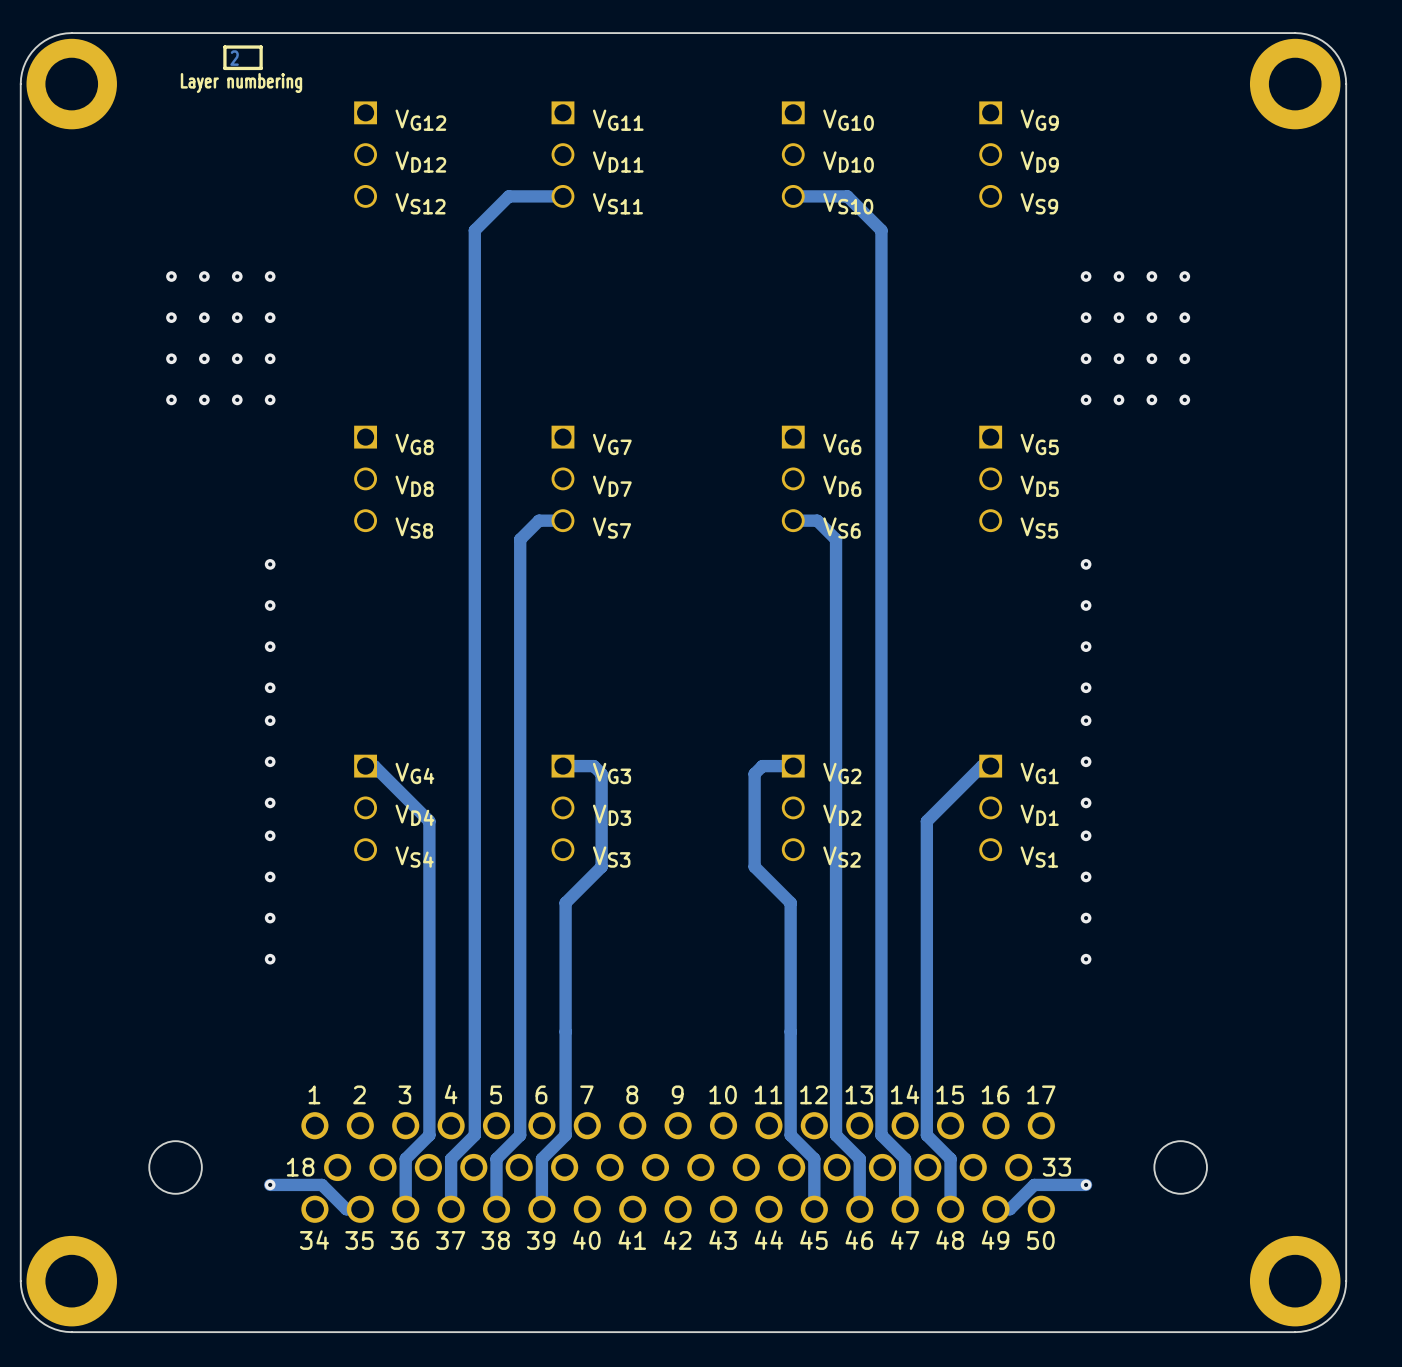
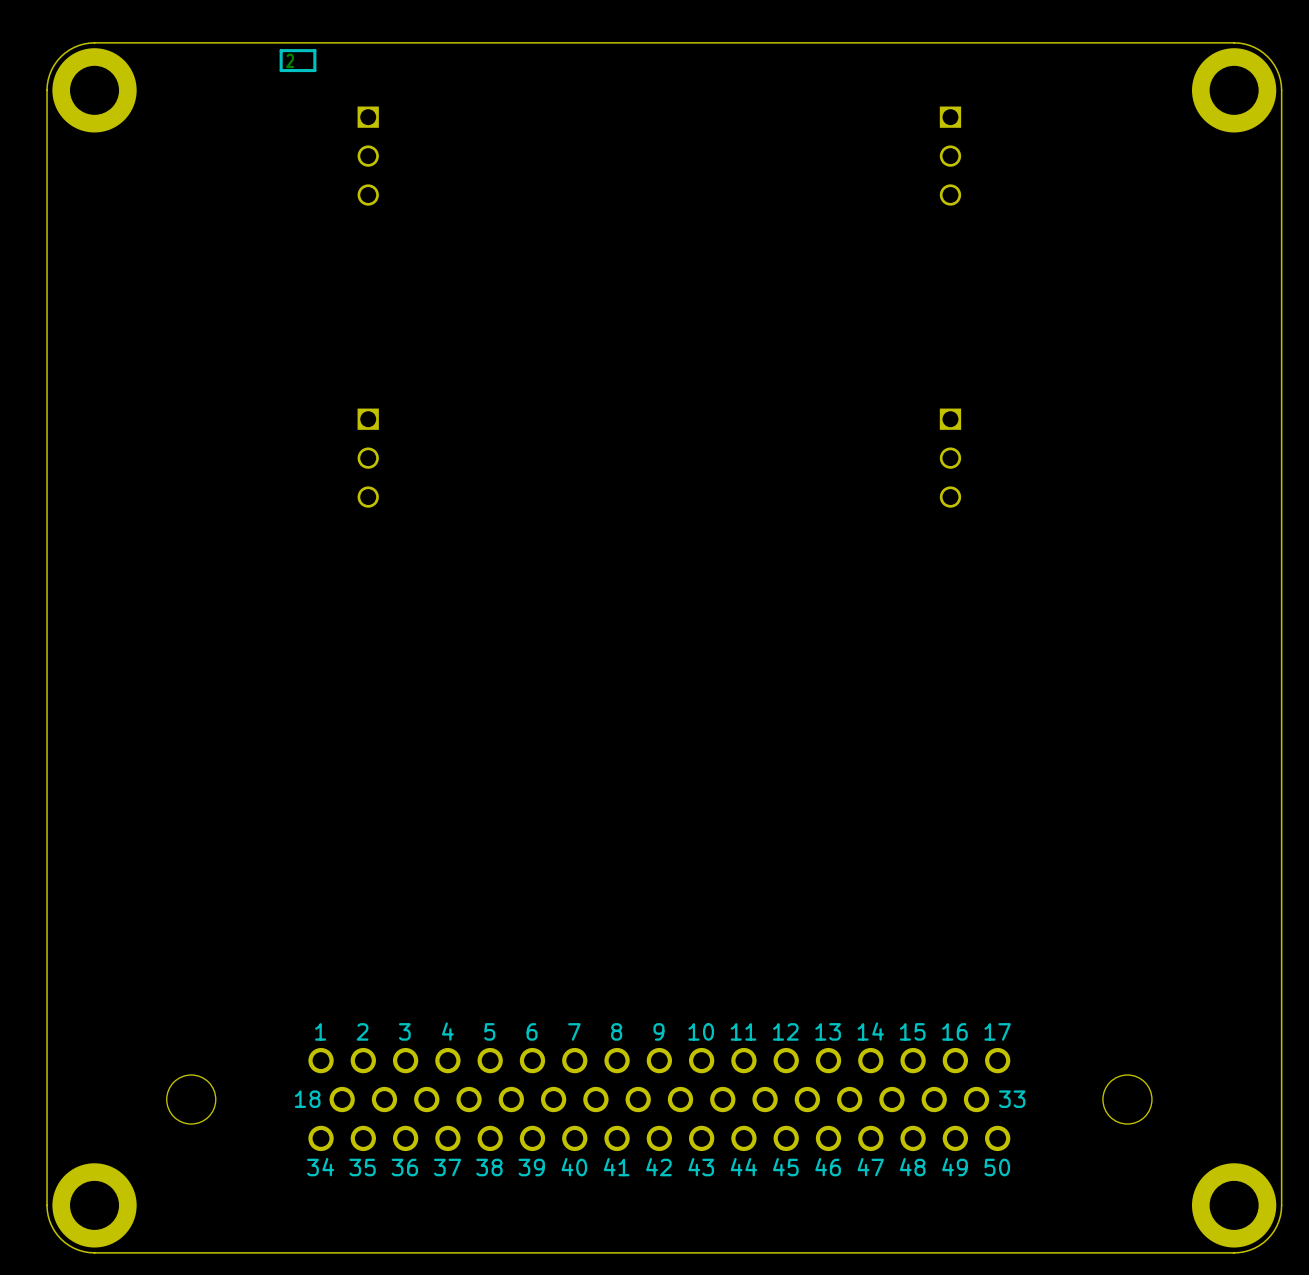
line: (261, 47) (261, 68) (224, 68) (224, 47) (261, 47) -> (314, 50) (314, 70) (281, 70) (281, 50) (314, 50)
text position: 2 (234, 58) -> 2 (290, 60)
text: Layer numbering (241, 82) -> none
text: VG12 (420, 120) -> none
text: VG11 (618, 120) -> none
text: VG10 (848, 120) -> none
text: VG9 (1039, 120) -> none
part: (562, 154) -> none
part: (793, 154) -> none
text: VD12 (420, 162) -> none
text: VD11 (618, 162) -> none
text: VD10 (848, 162) -> none
text: VD9 (1039, 162) -> none
track: (562, 196) (508, 196) (474, 230) (474, 1135) (451, 1158) (451, 1209) -> none
track: (793, 196) (847, 196) (881, 230) (881, 1135) (905, 1158) (905, 1209) -> none
text: VS12 (420, 203) -> none
text: VS11 (617, 203) -> none
text: VS10 (848, 203) -> none
text: VS9 (1039, 203) -> none
via: (171, 276) -> none
via: (204, 276) -> none
via: (237, 276) -> none
via: (270, 276) -> none
via: (1086, 276) -> none
via: (1118, 276) -> none
via: (1151, 276) -> none
via: (1184, 276) -> none
via: (171, 317) -> none
via: (204, 317) -> none
via: (237, 317) -> none
via: (270, 317) -> none
via: (1086, 317) -> none
via: (1118, 317) -> none
via: (1151, 317) -> none
via: (1184, 317) -> none
via: (171, 358) -> none
via: (204, 358) -> none
via: (237, 358) -> none
via: (270, 358) -> none
via: (1086, 358) -> none
via: (1118, 358) -> none
via: (1151, 358) -> none
via: (1184, 358) -> none
via: (171, 399) -> none
via: (204, 399) -> none
via: (237, 399) -> none
via: (270, 399) -> none
via: (1086, 399) -> none
via: (1118, 399) -> none
via: (1151, 399) -> none
via: (1184, 399) -> none
text: VG8 (414, 444) -> none
text: VG7 (612, 444) -> none
text: VG6 (842, 444) -> none
text: VG5 (1039, 444) -> none
part: (562, 478) -> none
part: (793, 478) -> none
text: VD8 (414, 486) -> none
text: VD7 (612, 486) -> none
text: VD6 (842, 486) -> none
text: VD5 (1039, 486) -> none
track: (562, 520) (539, 520) (520, 539) (520, 1135) (496, 1158) (496, 1209) -> none
track: (793, 520) (817, 520) (836, 539) (836, 1135) (859, 1158) (859, 1209) -> none
text: VS8 (414, 528) -> none
text: VS7 (611, 528) -> none
text: VS6 (841, 528) -> none
text: VS5 (1039, 528) -> none
via: (270, 564) -> none
via: (1086, 564) -> none
via: (270, 605) -> none
via: (1086, 605) -> none
via: (270, 646) -> none
via: (1086, 646) -> none
via: (270, 687) -> none
via: (1086, 687) -> none
via: (270, 720) -> none
via: (1086, 720) -> none
via: (270, 761) -> none
via: (1086, 761) -> none
track: (365, 766) (374, 766) (429, 821) (429, 1135) (405, 1158) (405, 1209) -> none
track: (562, 766) (593, 766) (601, 773) (601, 866) (565, 902) (565, 1135) (541, 1158) (541, 1209) -> none
track: (793, 766) (762, 766) (754, 773) (754, 866) (790, 902) (790, 1135) (814, 1158) (814, 1209) -> none
track: (990, 766) (982, 766) (926, 821) (926, 1135) (950, 1158) (950, 1209) -> none
text: VG4 (414, 773) -> none
text: VG3 (611, 773) -> none
text: VG2 (842, 773) -> none
text: VG1 (1039, 773) -> none
via: (270, 802) -> none
via: (1086, 802) -> none
part: (365, 807) -> none
part: (562, 807) -> none
part: (793, 807) -> none
part: (990, 807) -> none
text: VD4 (414, 815) -> none
text: VD3 (611, 815) -> none
text: VD2 (842, 815) -> none
text: VD1 (1039, 815) -> none
via: (270, 835) -> none
via: (1086, 835) -> none
text: VS4 (414, 857) -> none
text: VS3 (611, 857) -> none
text: VS2 (841, 857) -> none
text: VS1 (1039, 857) -> none
via: (270, 876) -> none
via: (1086, 876) -> none
via: (270, 918) -> none
via: (1086, 918) -> none
via: (270, 959) -> none
via: (1086, 959) -> none
track: (270, 1184) (321, 1184) (346, 1209) (360, 1209) -> none
via: (270, 1184) -> none
track: (1086, 1184) (1034, 1184) (1009, 1209) (995, 1209) -> none
via: (1086, 1184) -> none

